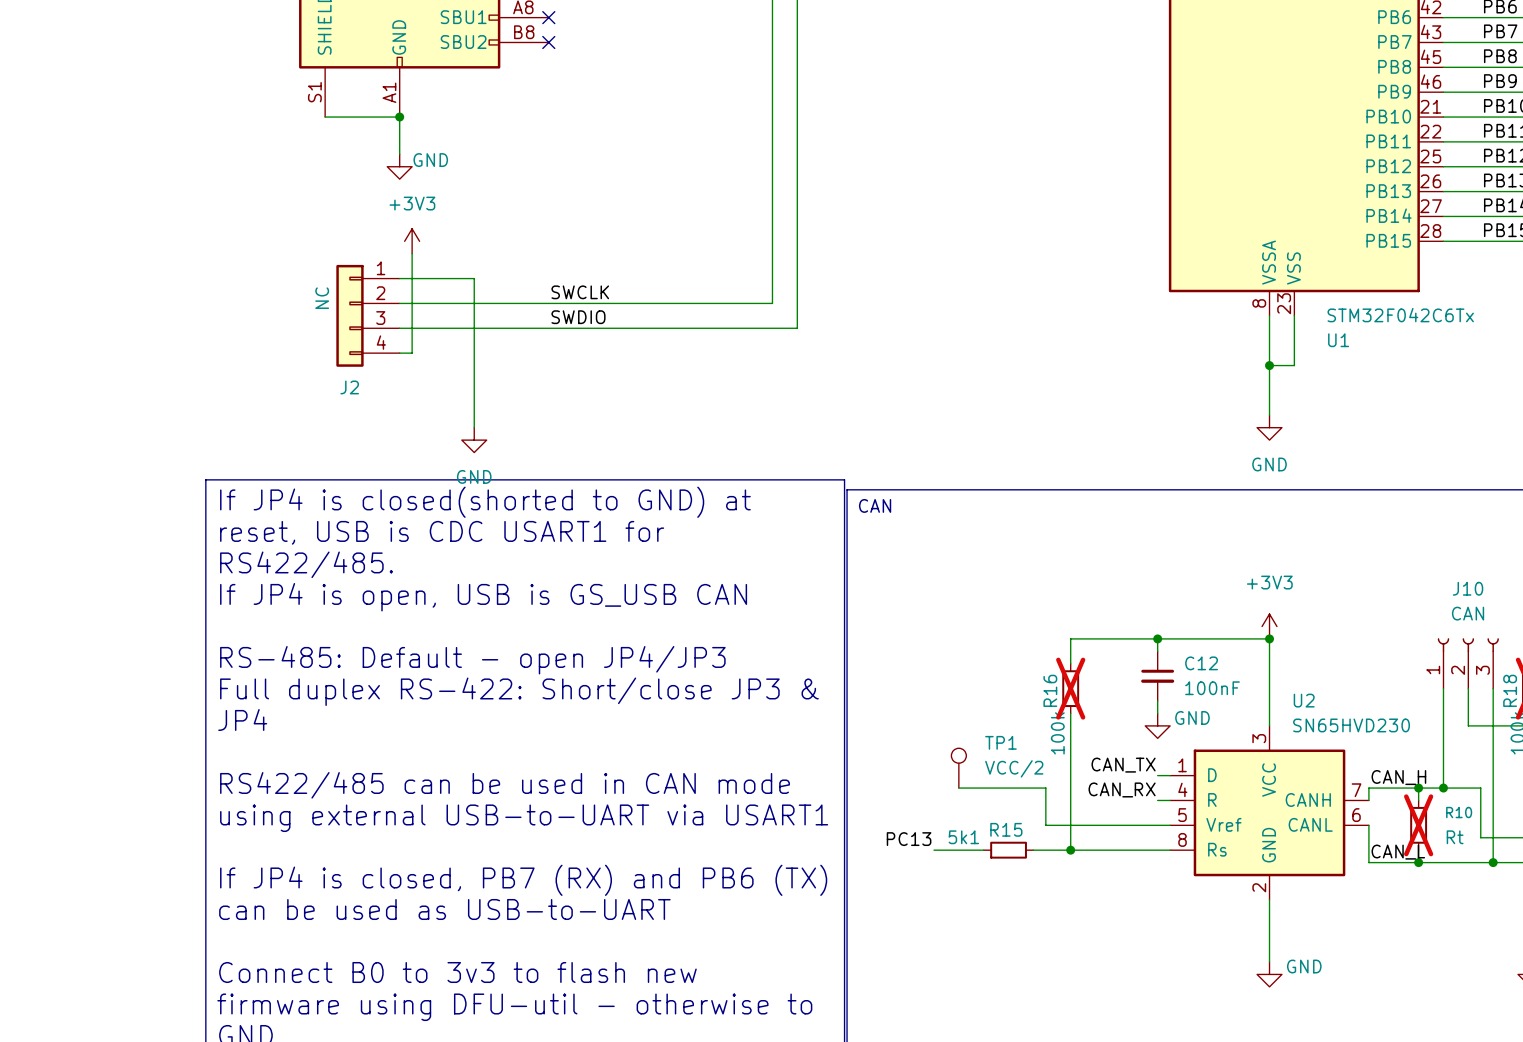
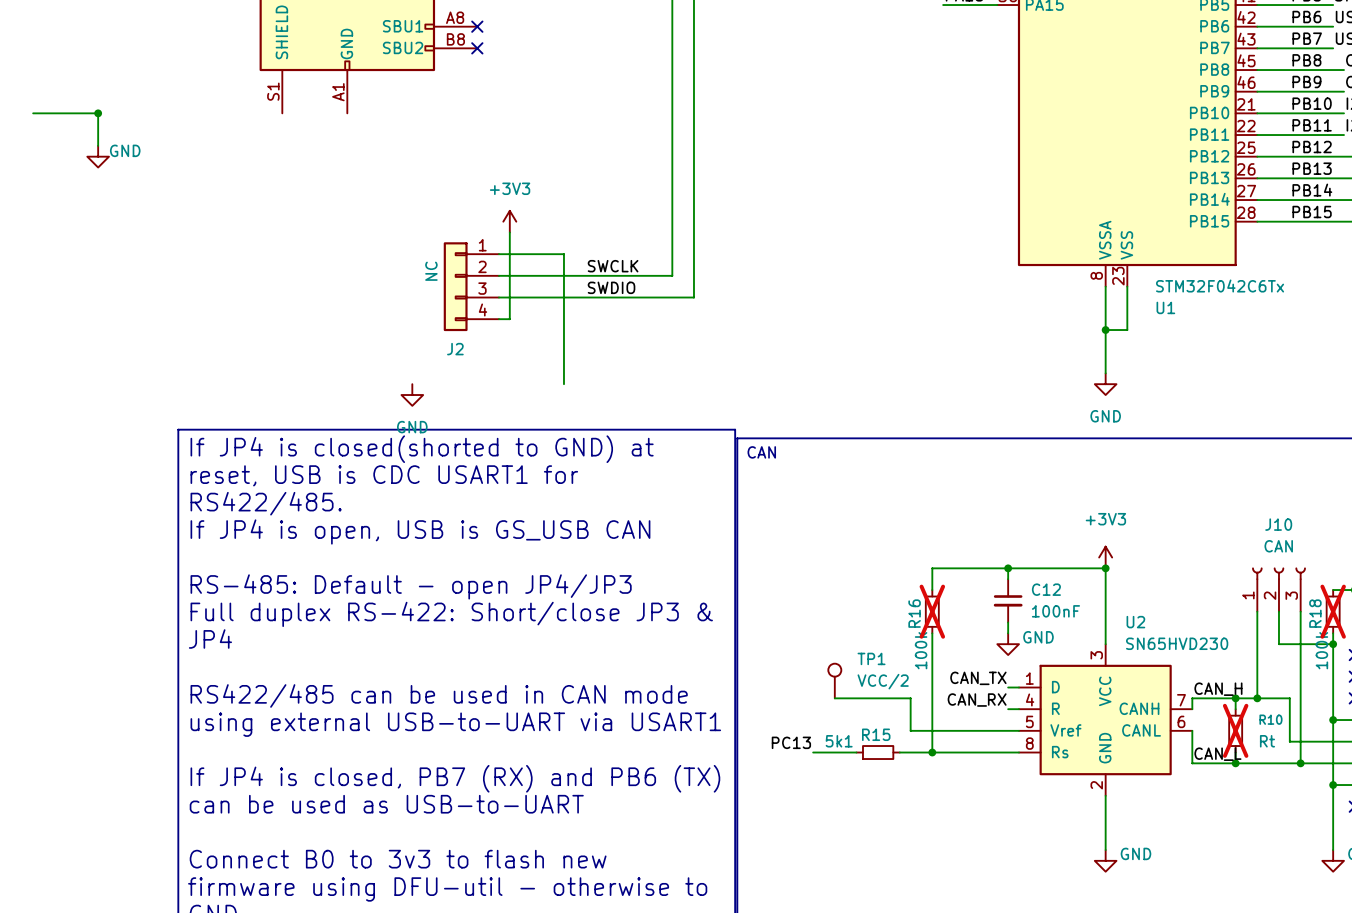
wire: none -> (33, 113) (98, 113) (98, 145)
junction: none -> (98, 113)
wire: (325, 117) (399, 117) (399, 154) -> none
junction: (399, 117) -> none
power symbol: none -> GND (98, 156)
power symbol: GND (399, 166) -> none
power symbol position: +3V3 (412, 241) -> +3V3 (509, 221)
wire: (412, 253) (412, 353) (399, 353) -> (509, 232) (509, 319) (498, 319)
wire: (399, 278) (474, 278) (474, 427) -> (498, 254) (563, 254) (563, 384)
label position: SWCLK (580, 292) -> SWCLK (613, 266)
wire: (399, 303) (573, 303) -> none
J2 position: (368, 315) -> (471, 286)
label position: SWDIO (578, 317) -> SWDIO (611, 287)
wire: (399, 328) (573, 328) -> none

